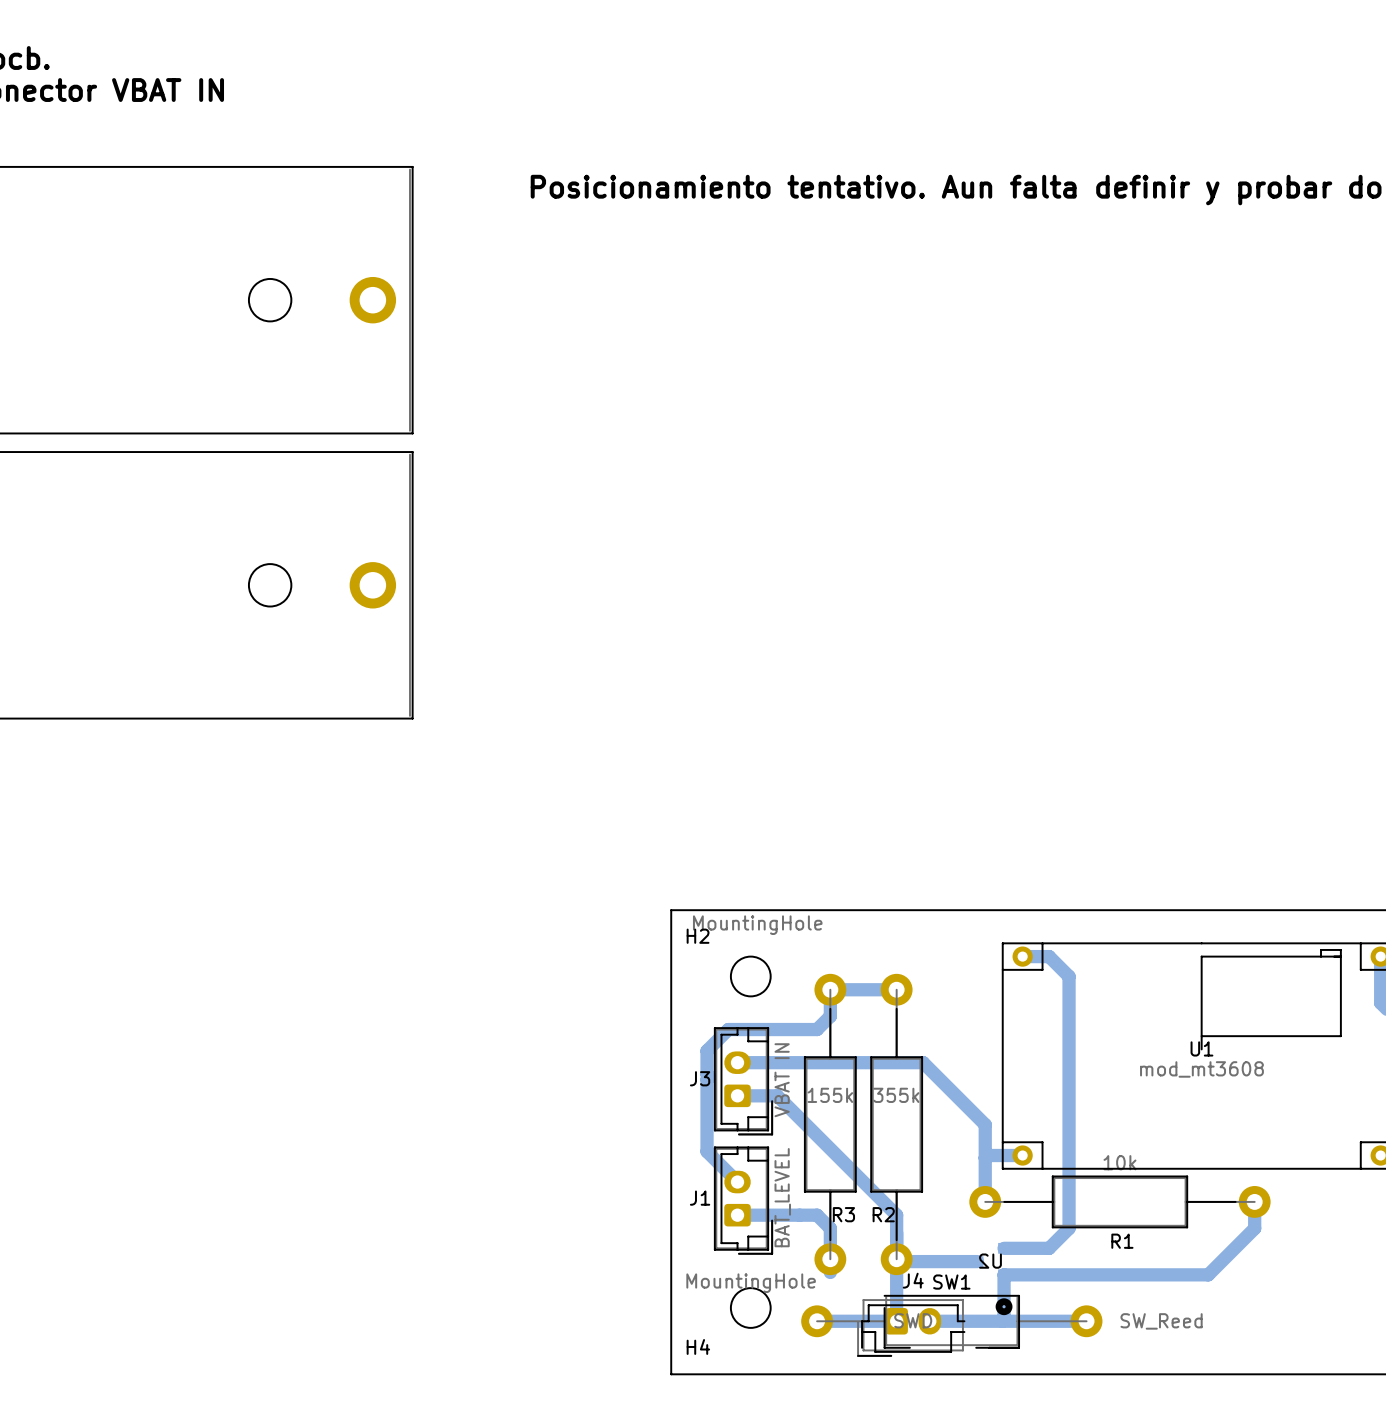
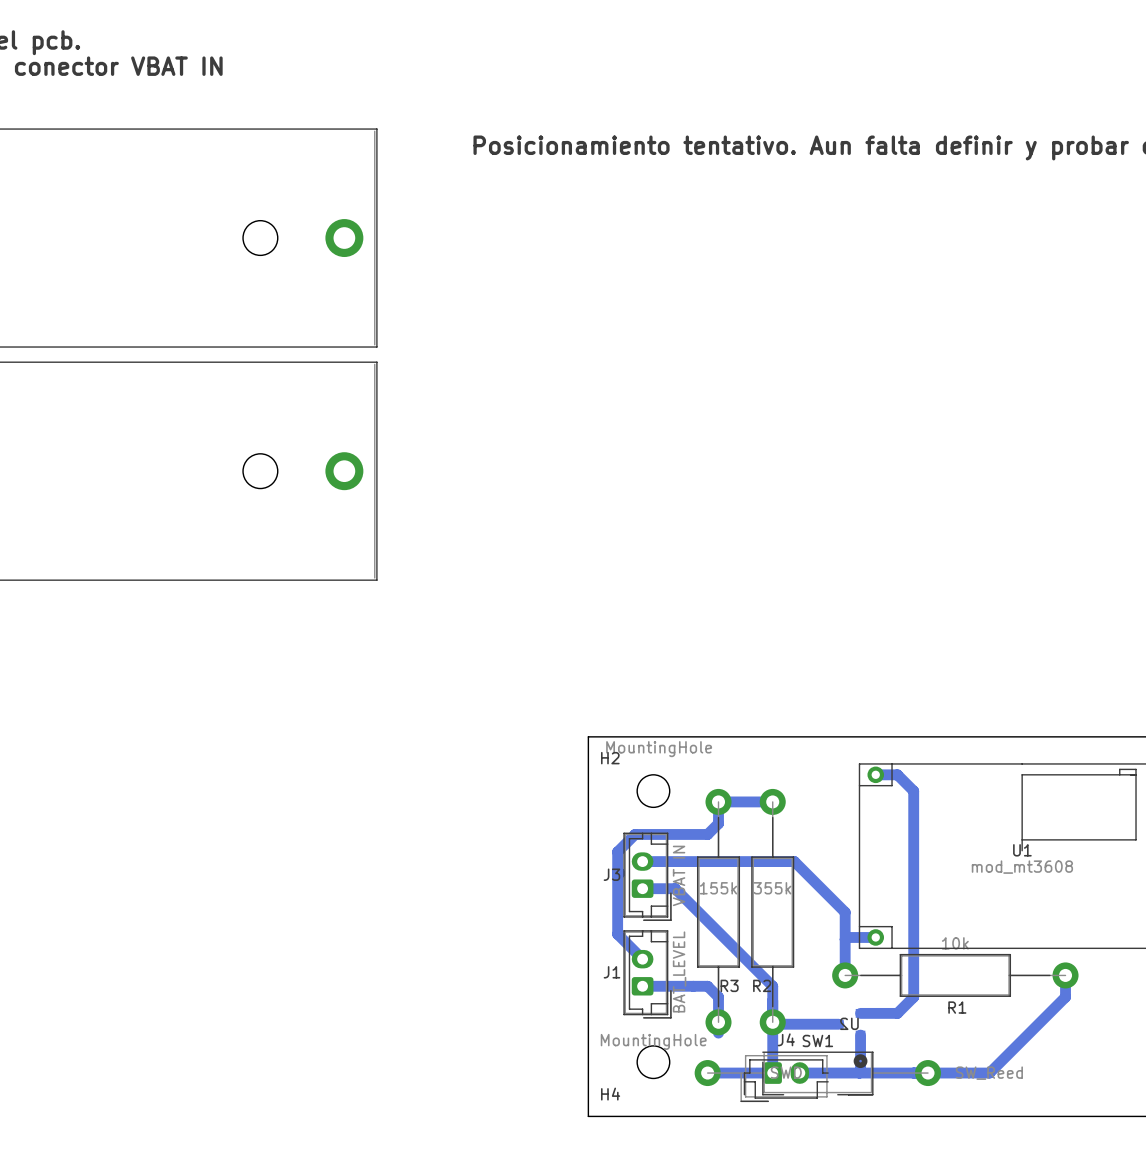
bottom track: (1004, 1274) (1208, 1274) -> (928, 1073) (989, 1073) (1027, 1035)

